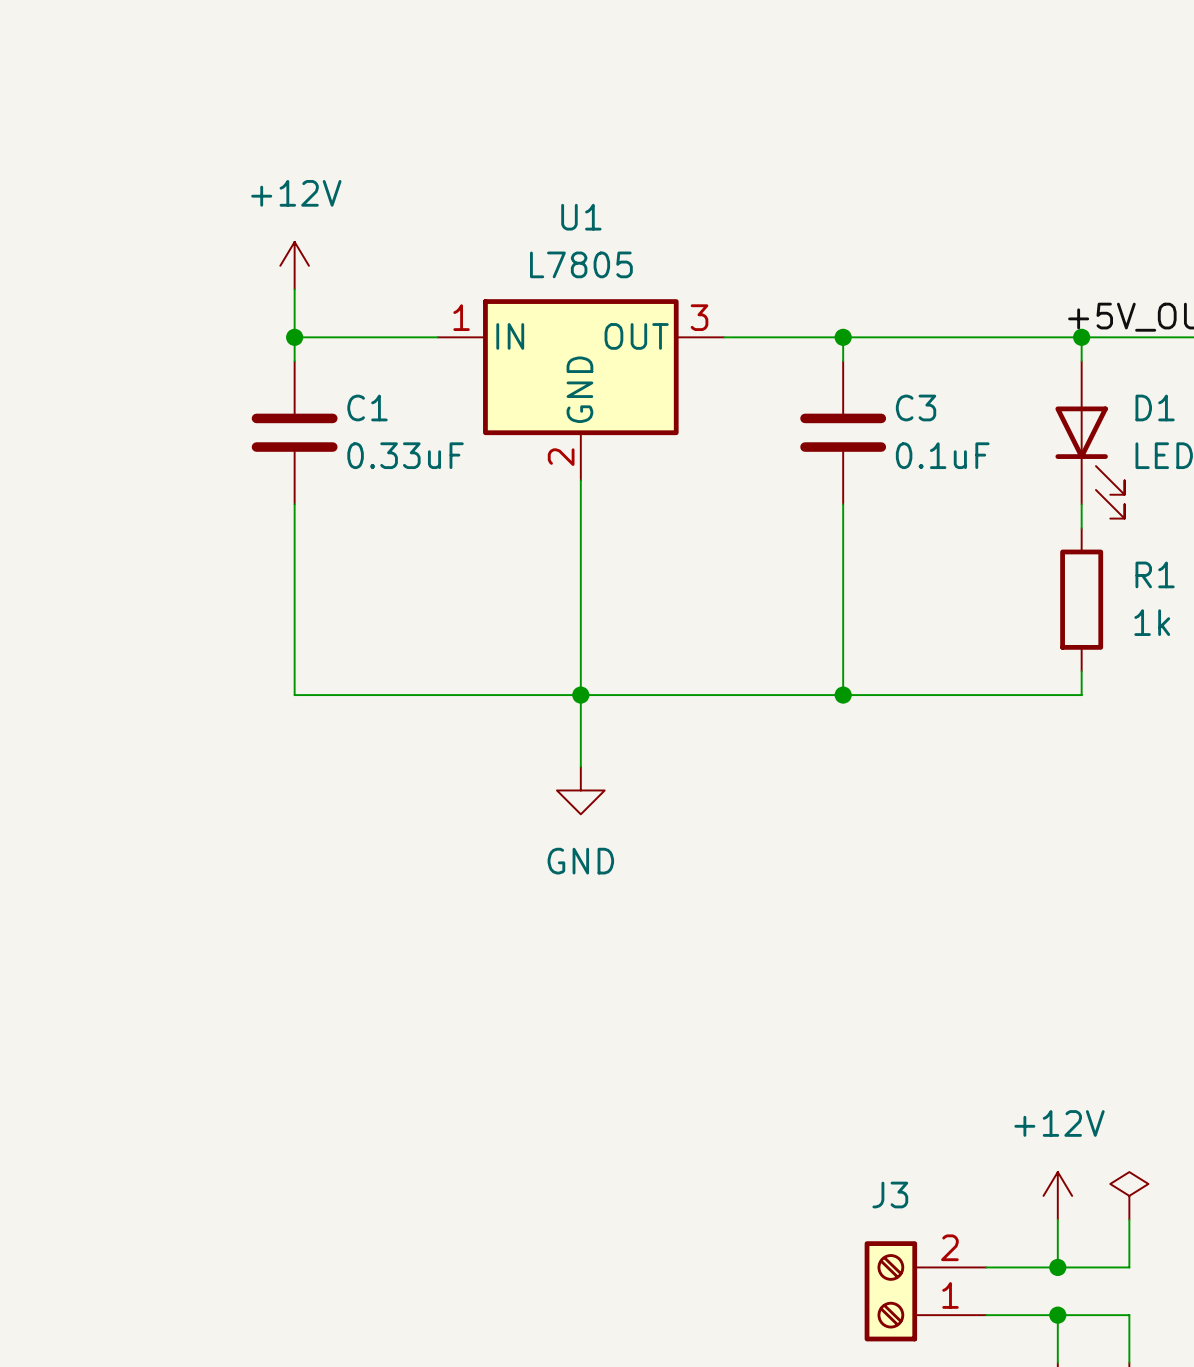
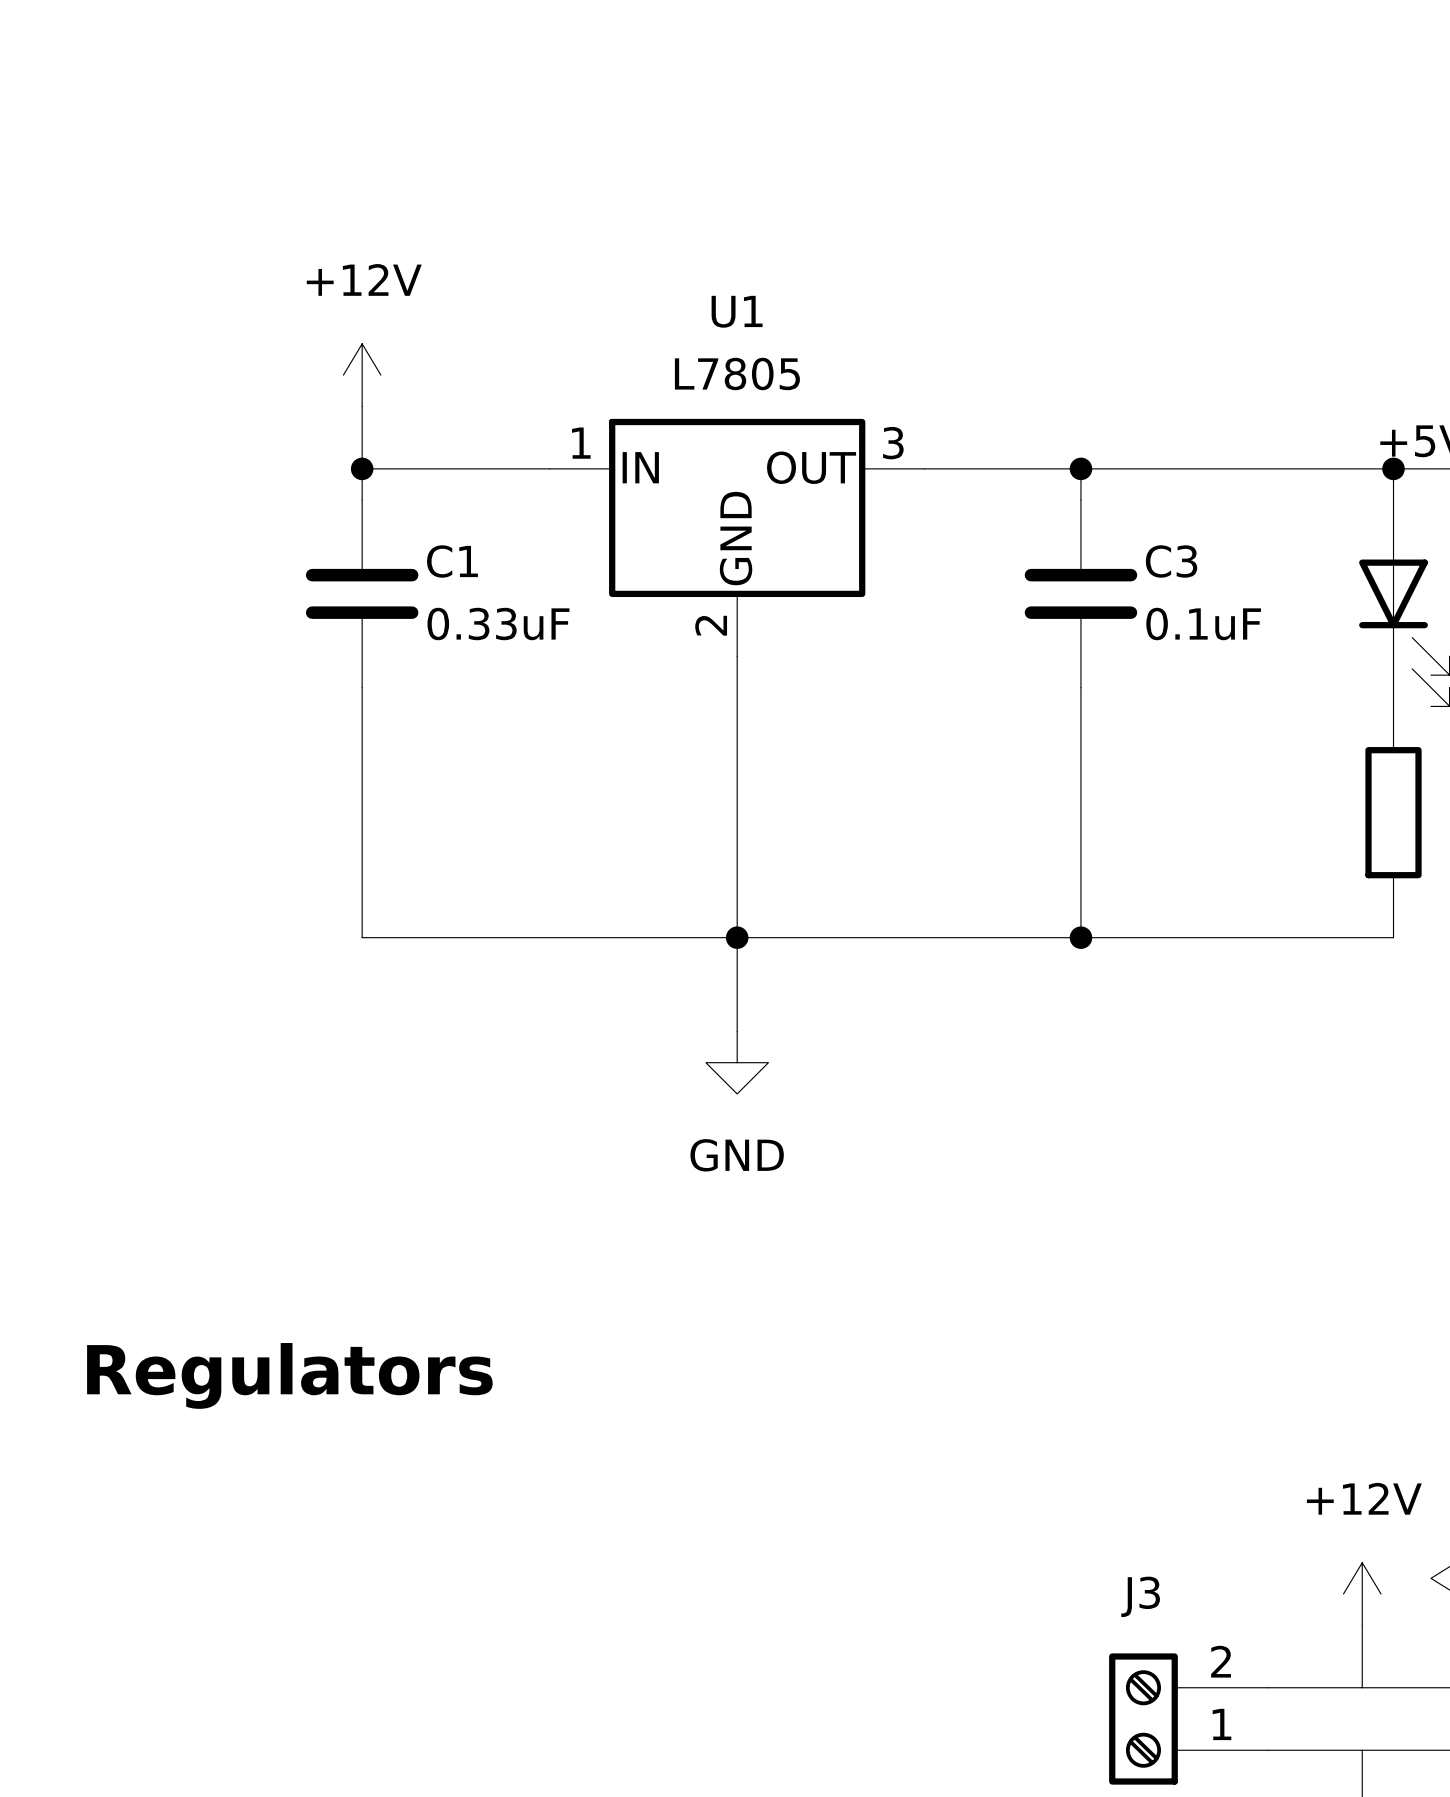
text: none -> Regulators (289, 1375)
junction: (1057, 1267) -> none
junction: (1057, 1315) -> none

